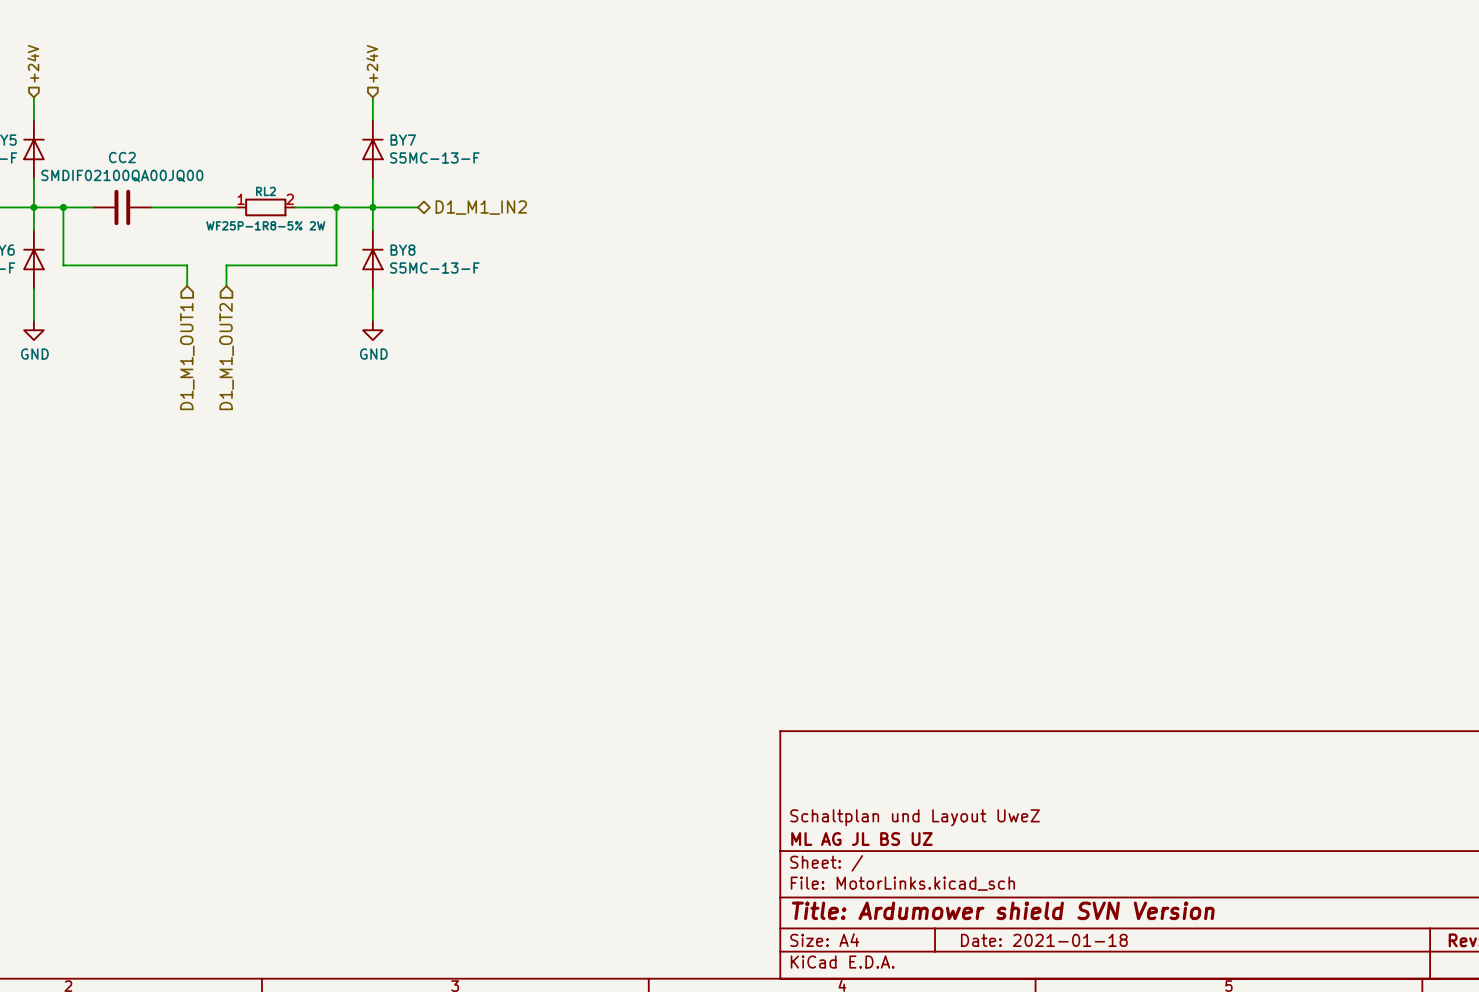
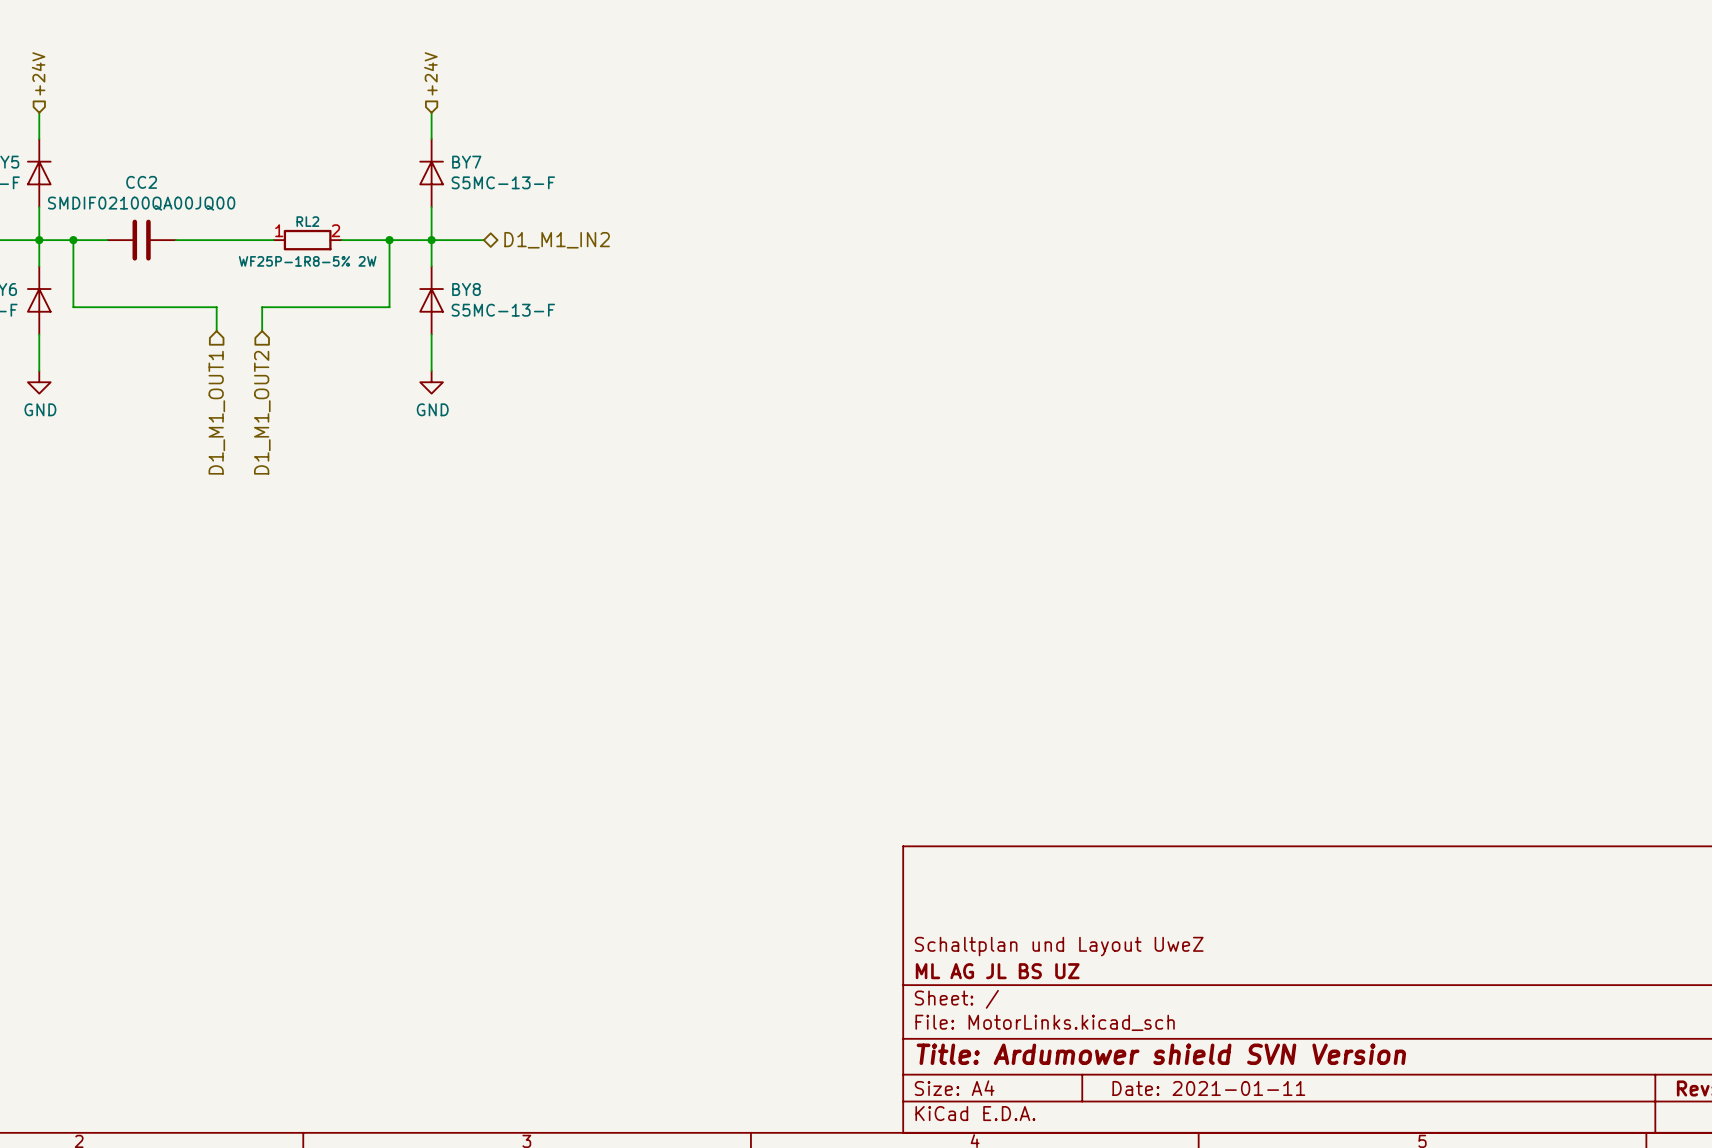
title block: Date: 2021-01-18 (1044, 940) -> Date: 2021-01-11 (1208, 1088)

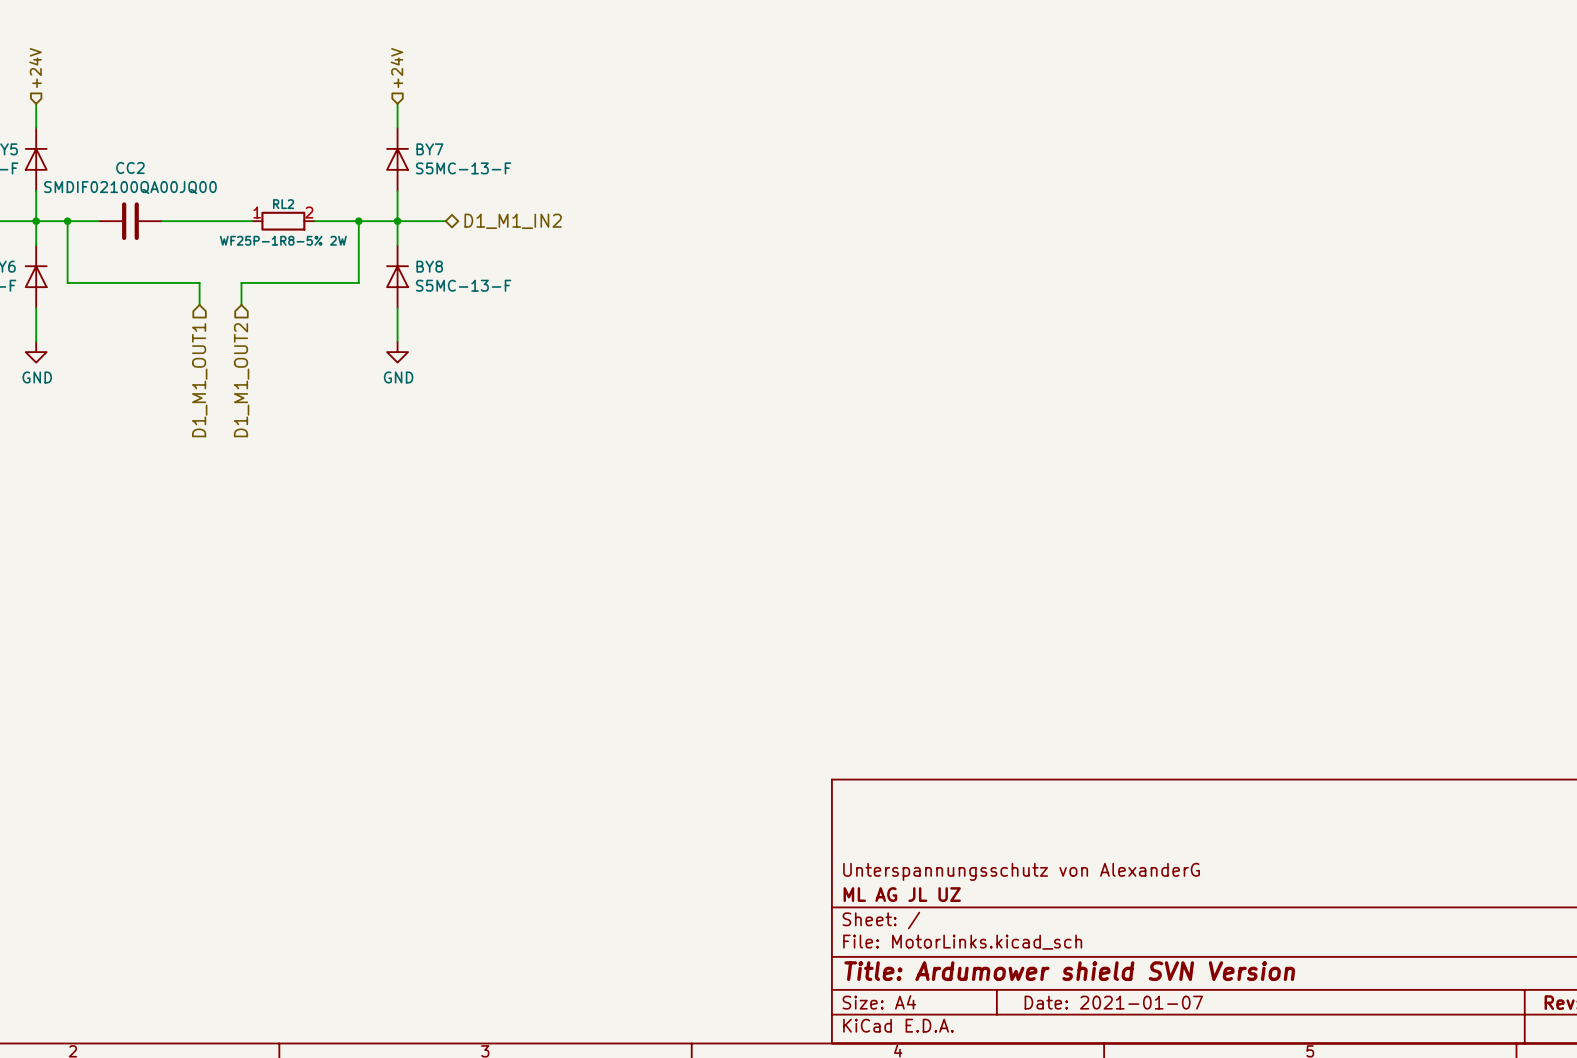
title block: Schaltplan und Layout UweZ (1059, 946) -> Unterspannungsschutz von AlexanderG (1021, 871)
title block: ML AG JL BS UZ (997, 971) -> ML AG JL UZ (902, 894)
title block: Date: 2021-01-11 (1208, 1088) -> Date: 2021-01-07 (1113, 1002)

